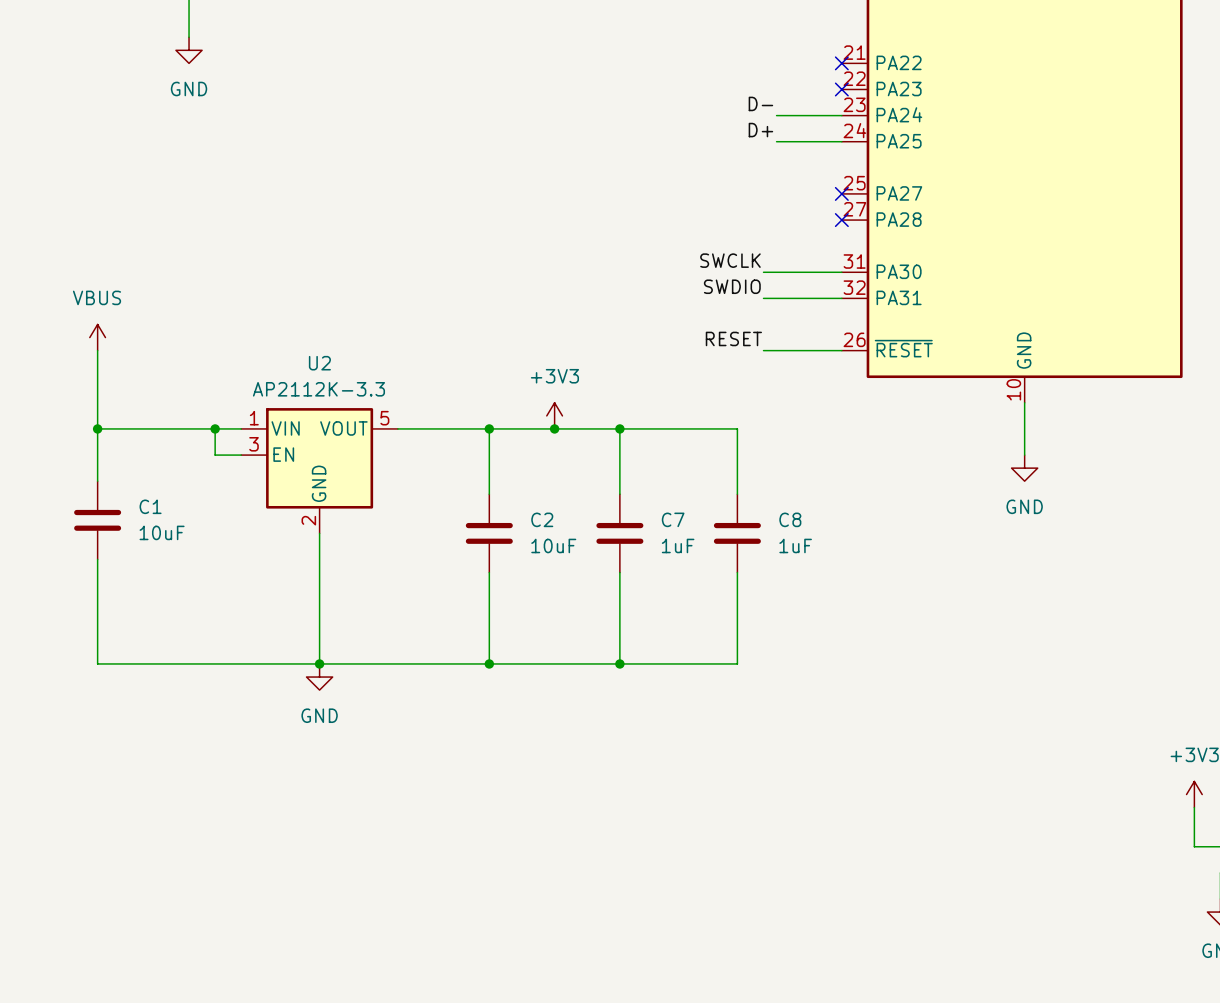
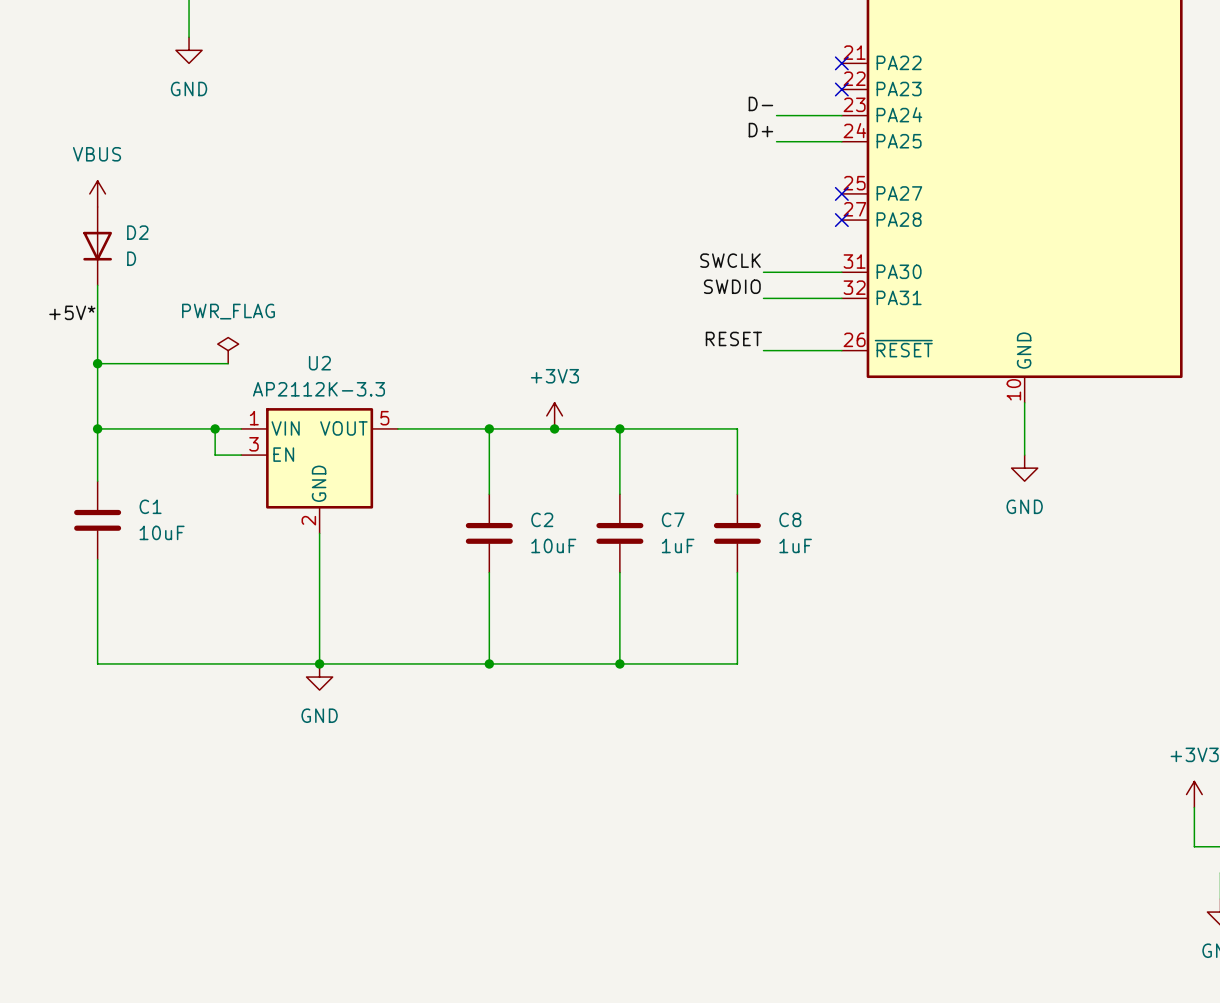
D2: none -> D (97, 246)
wire: none -> (97, 285) (97, 350)
label: none -> +5V* (72, 312)
power symbol position: VBUS (97, 337) -> VBUS (97, 193)
power symbol: none -> PWR_FLAG (228, 350)
wire: none -> (97, 363) (228, 363)
junction: none -> (97, 363)

